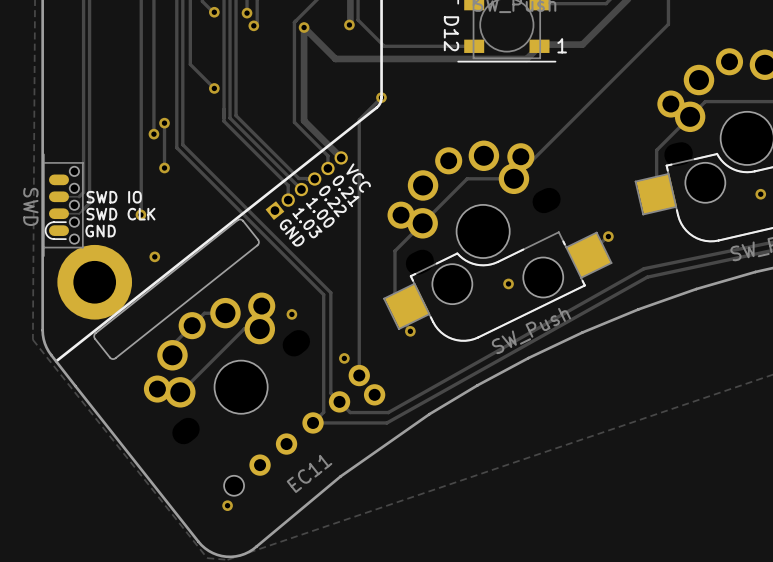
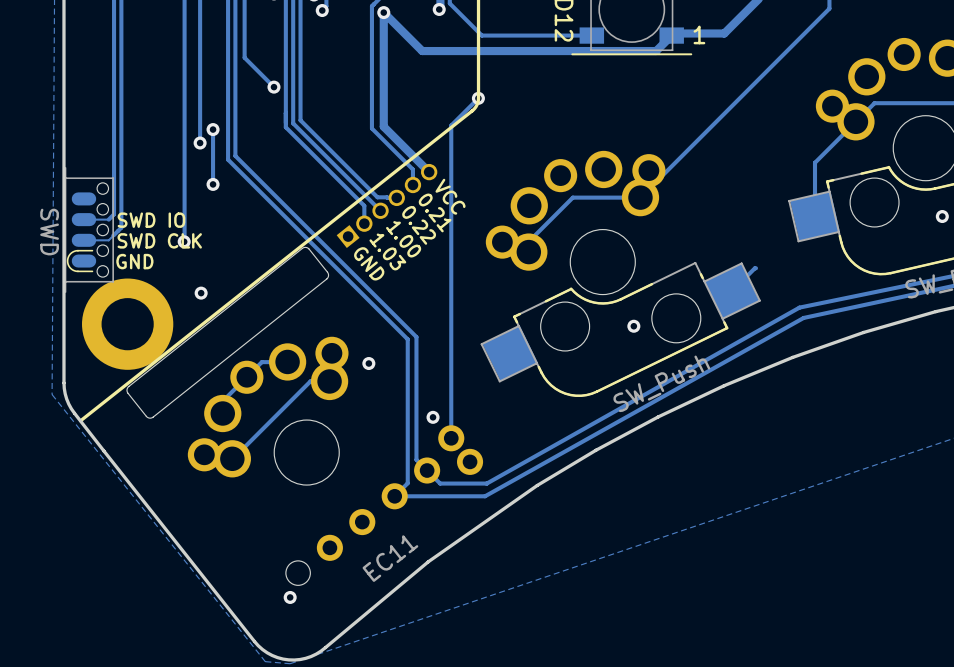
track: (467, 178) (394, 251) (394, 293) (407, 306) (407, 328) (410, 331) -> (583, 197) (572, 197) (528, 242) (502, 242)
via: (608, 236) -> none
via: (410, 331) -> none

